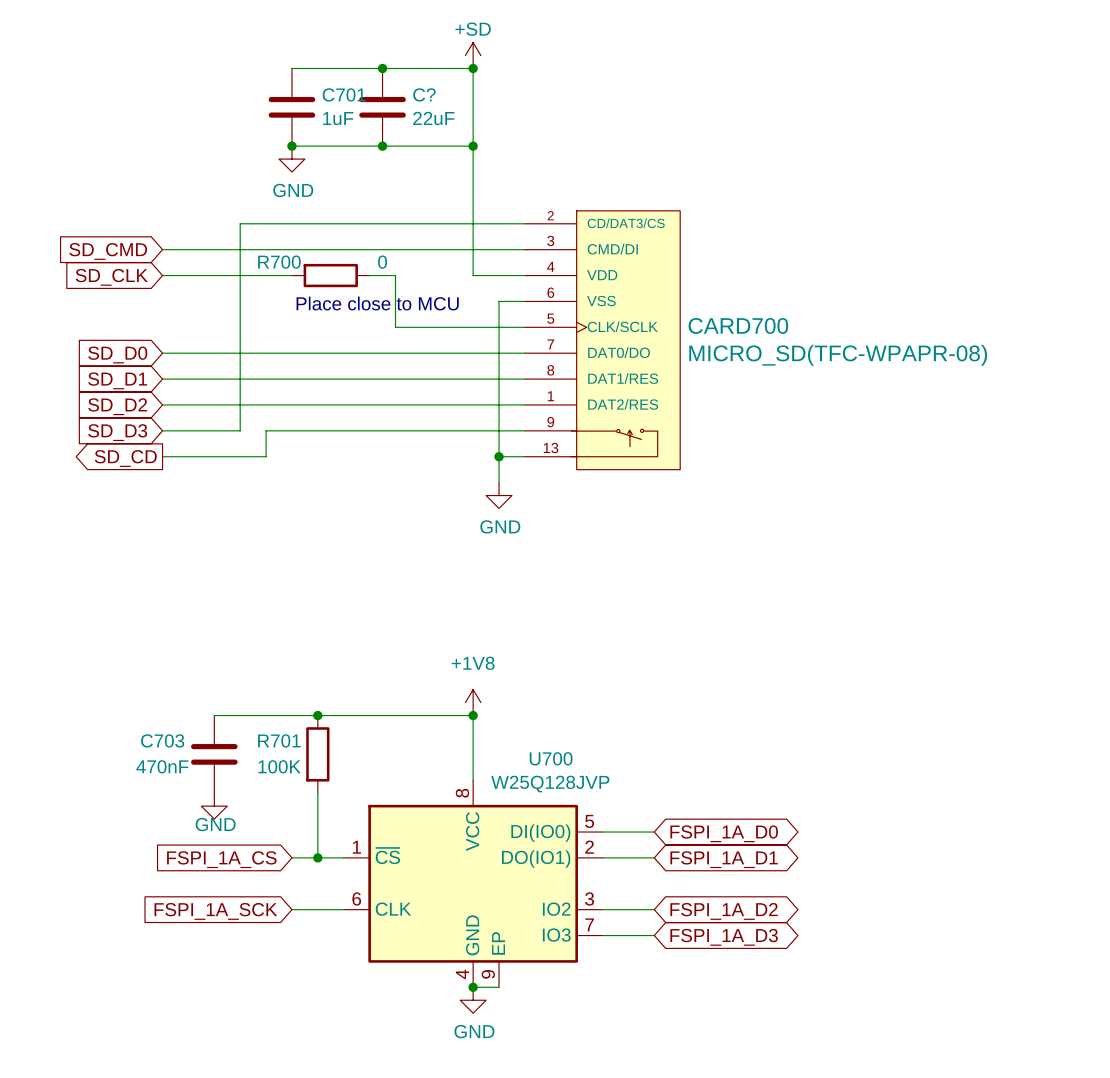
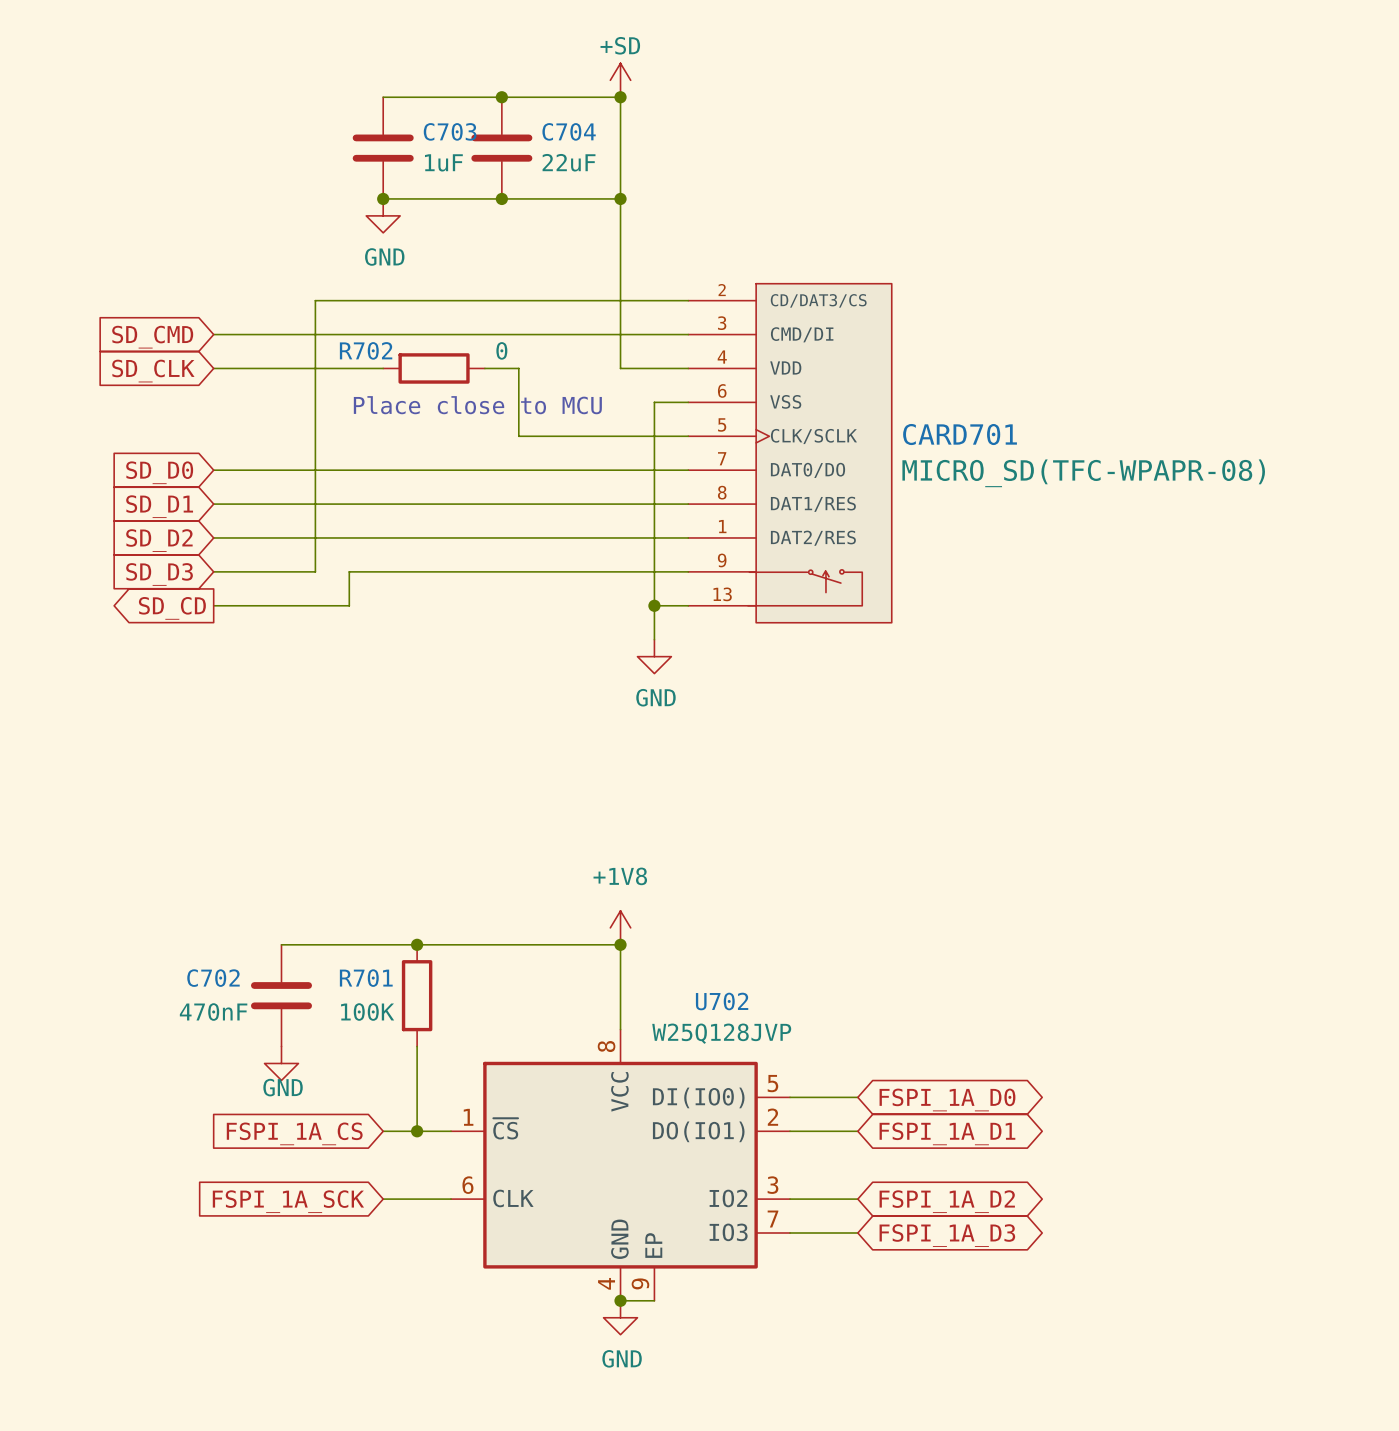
C701 name: C701 (344, 94) -> C703 (450, 131)
C? name: C? (424, 94) -> C704 (569, 131)
R700 name: R700 (279, 262) -> R702 (366, 350)
CARD700 name: CARD700 (738, 325) -> CARD701 (960, 434)
C703 name: C703 (162, 740) -> C702 (213, 978)
U700 name: U700 (551, 758) -> U702 (722, 1001)

